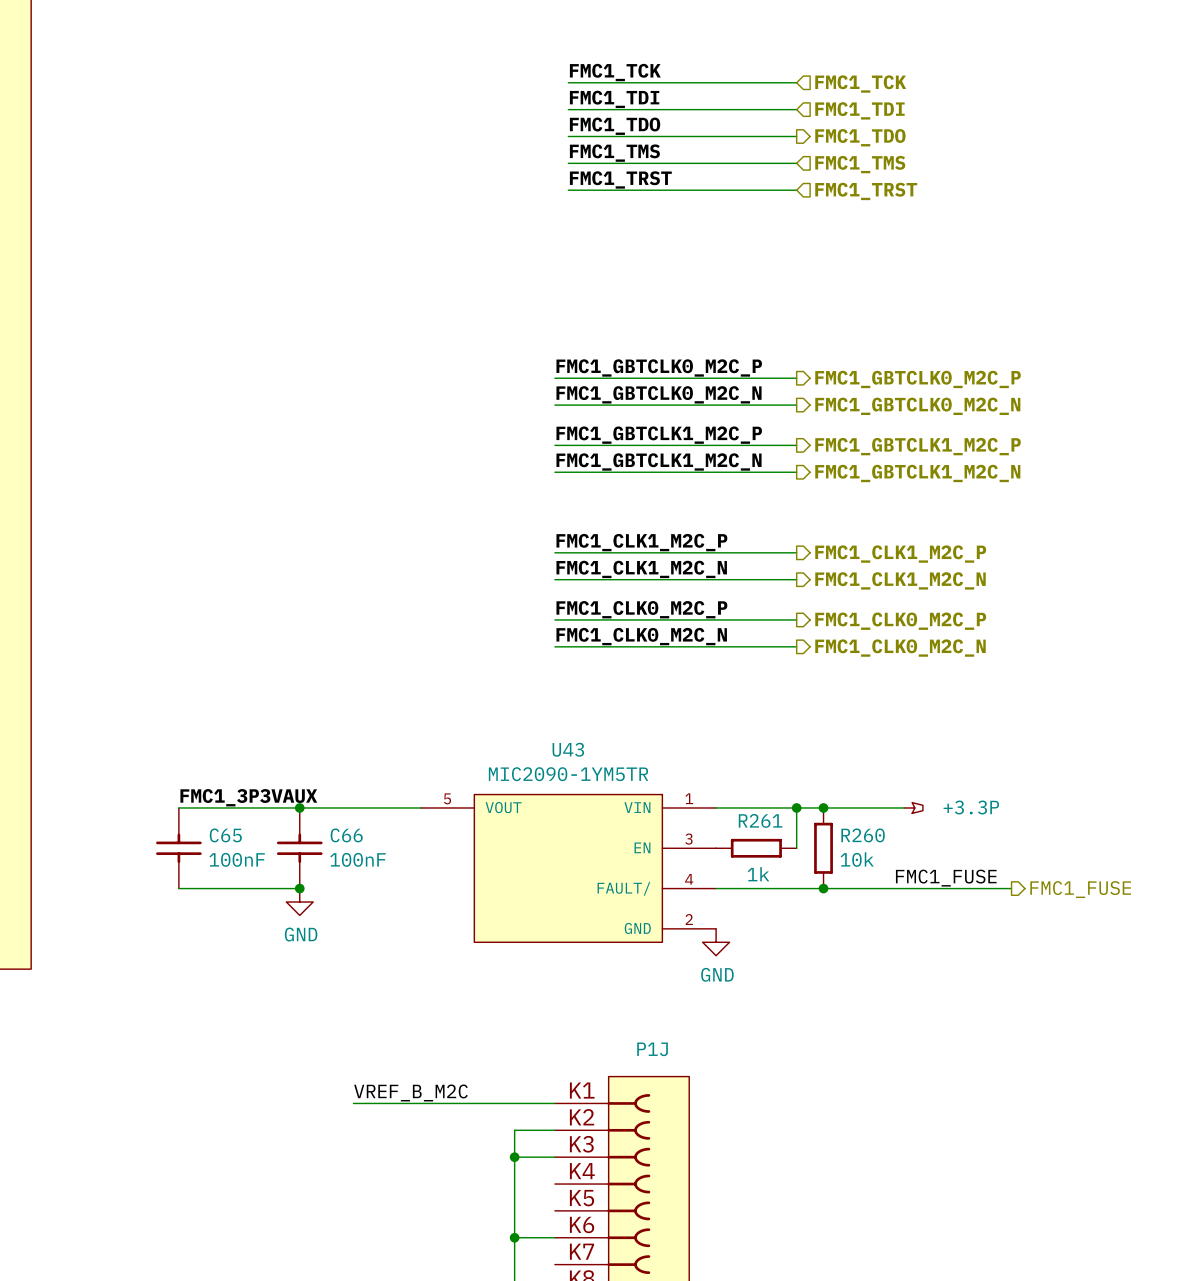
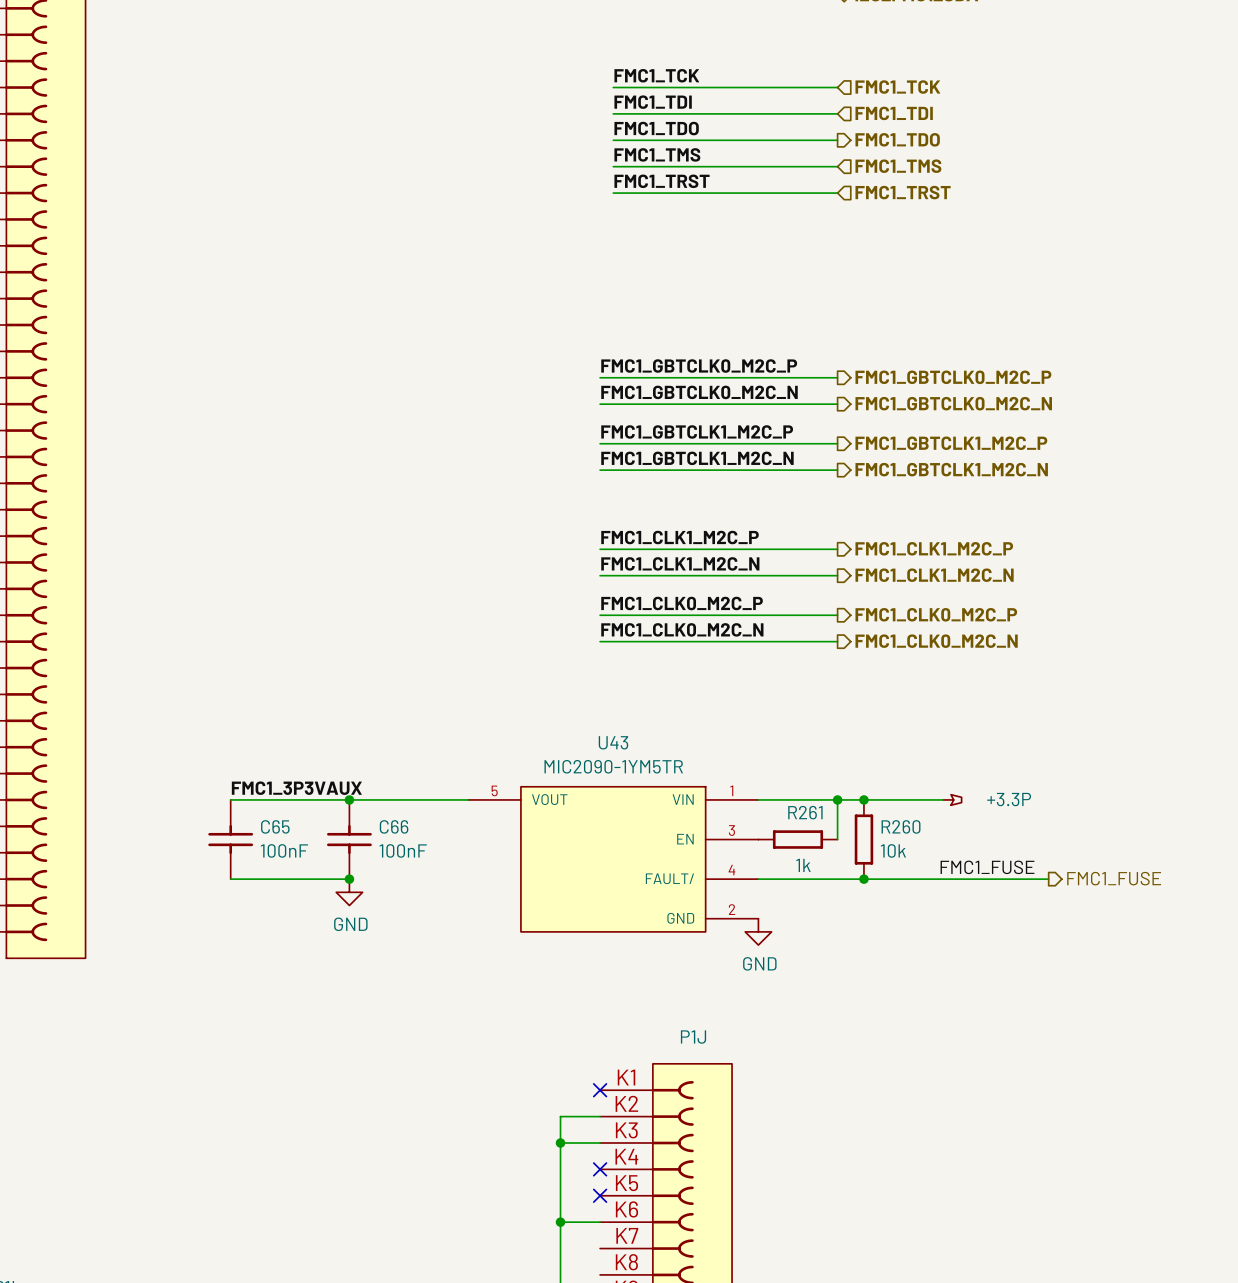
label: VREF_B_M2C (410, 1092) -> none
wire: (353, 1103) (554, 1103) -> none
no-connect mark: none -> (600, 1090)
no-connect mark: none -> (600, 1169)
no-connect mark: none -> (600, 1195)

